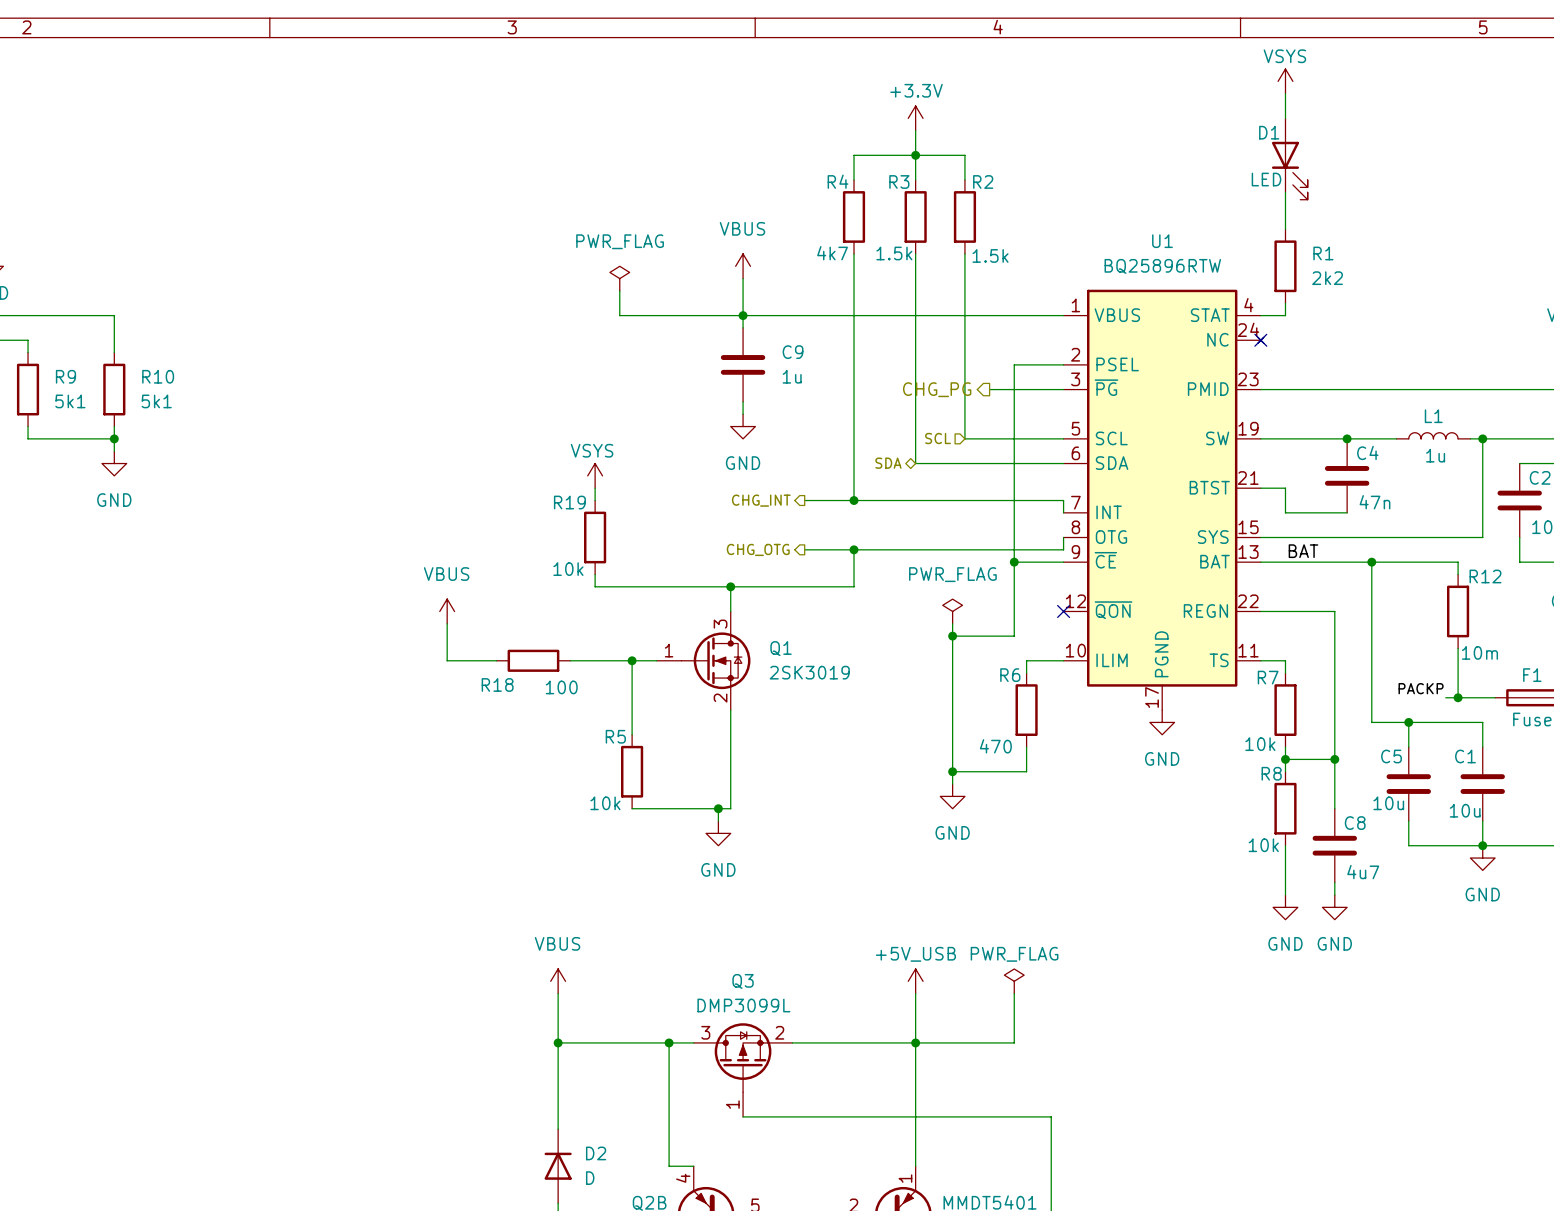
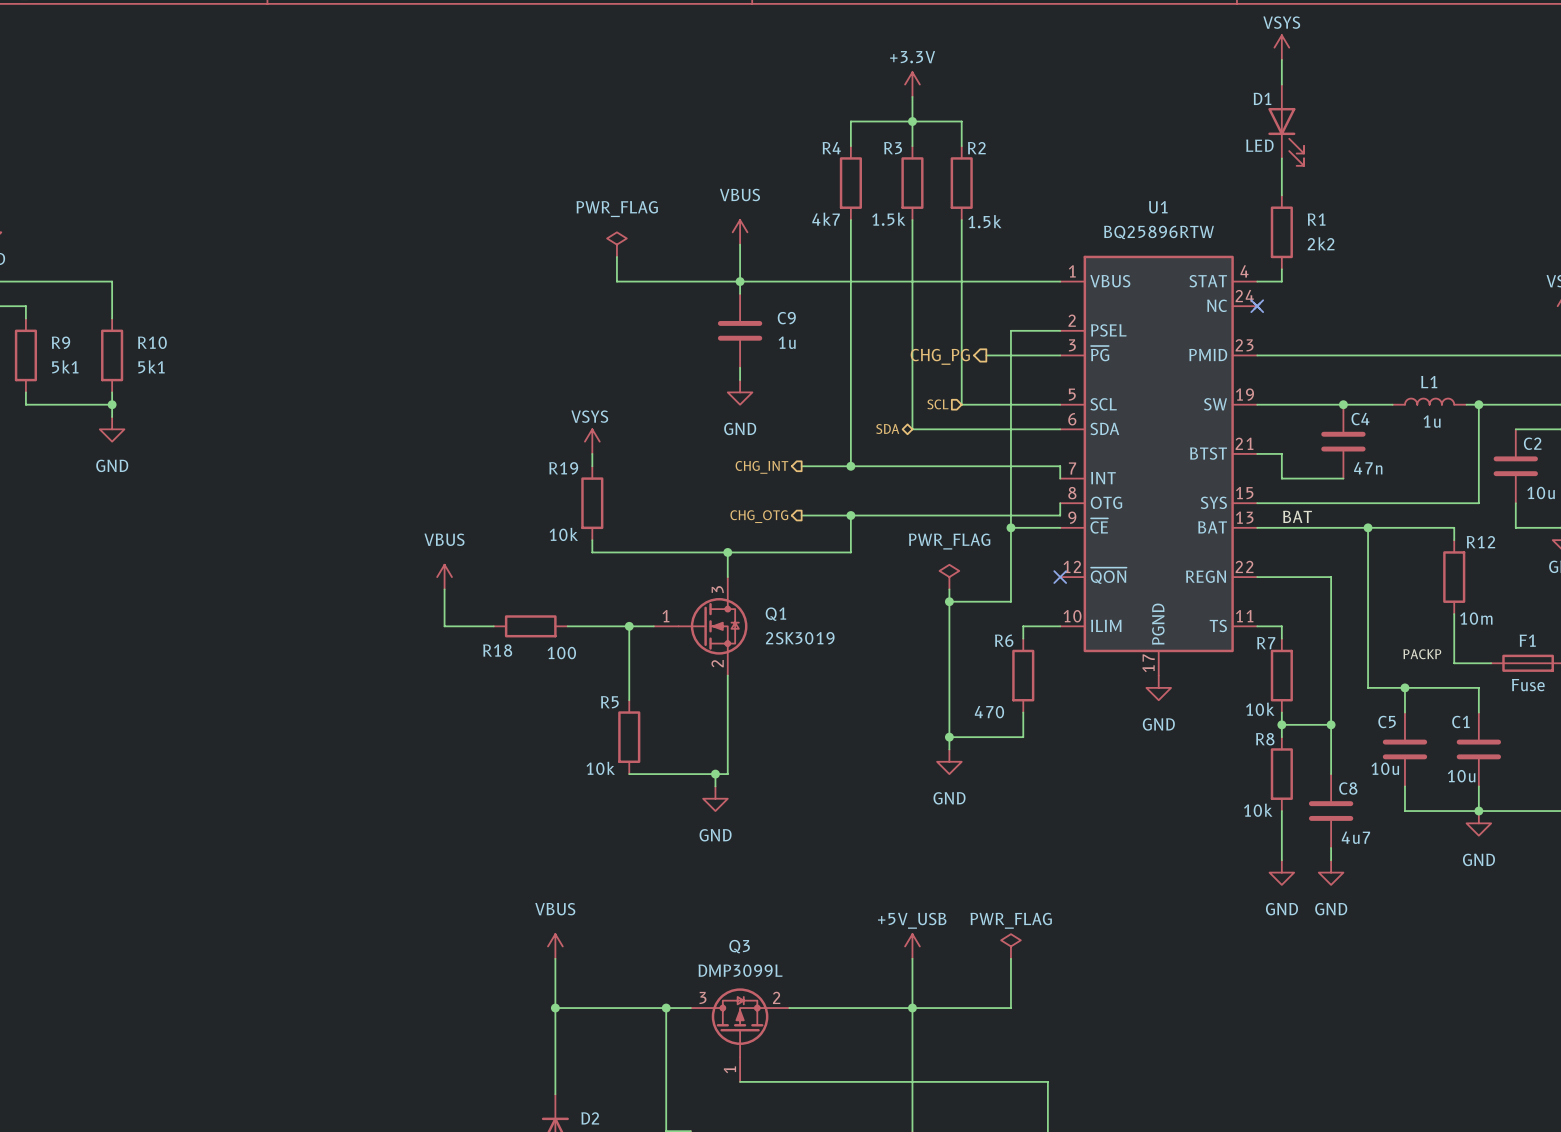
wire: (1445, 697) (1458, 697) -> none
junction: (1458, 697) -> none

